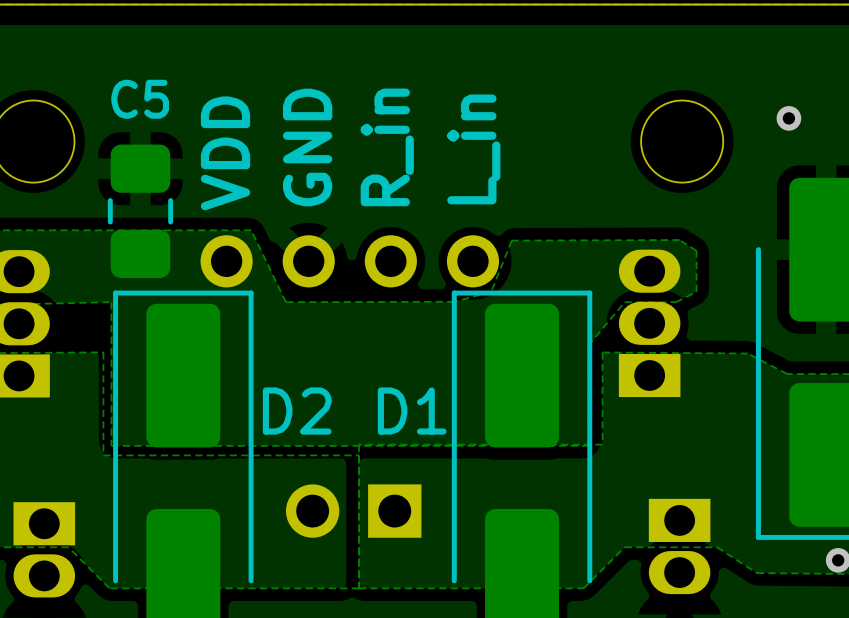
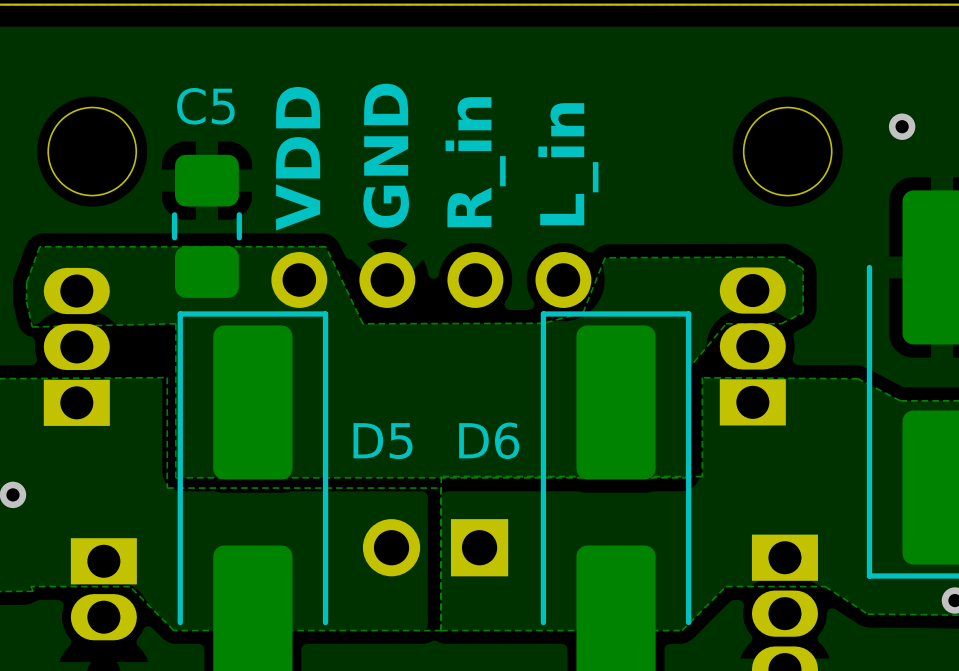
D2 name: D2 (297, 411) -> D5 (383, 441)
D1 name: D1 (412, 411) -> D6 (489, 440)

